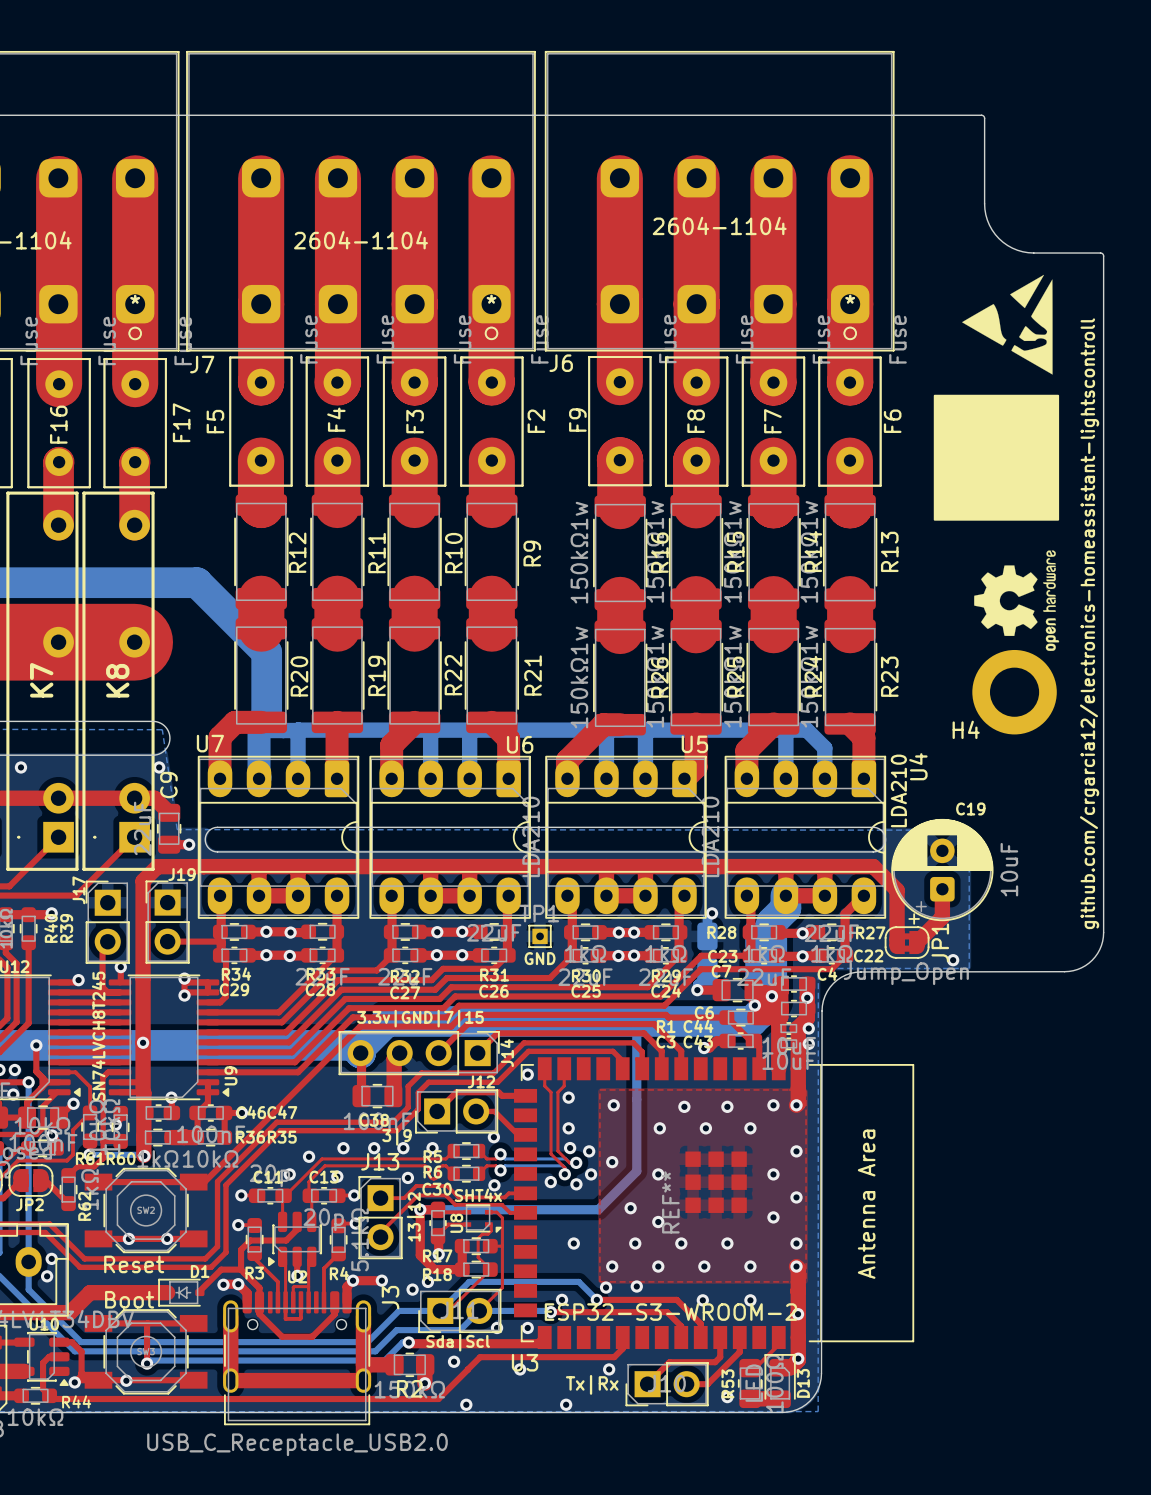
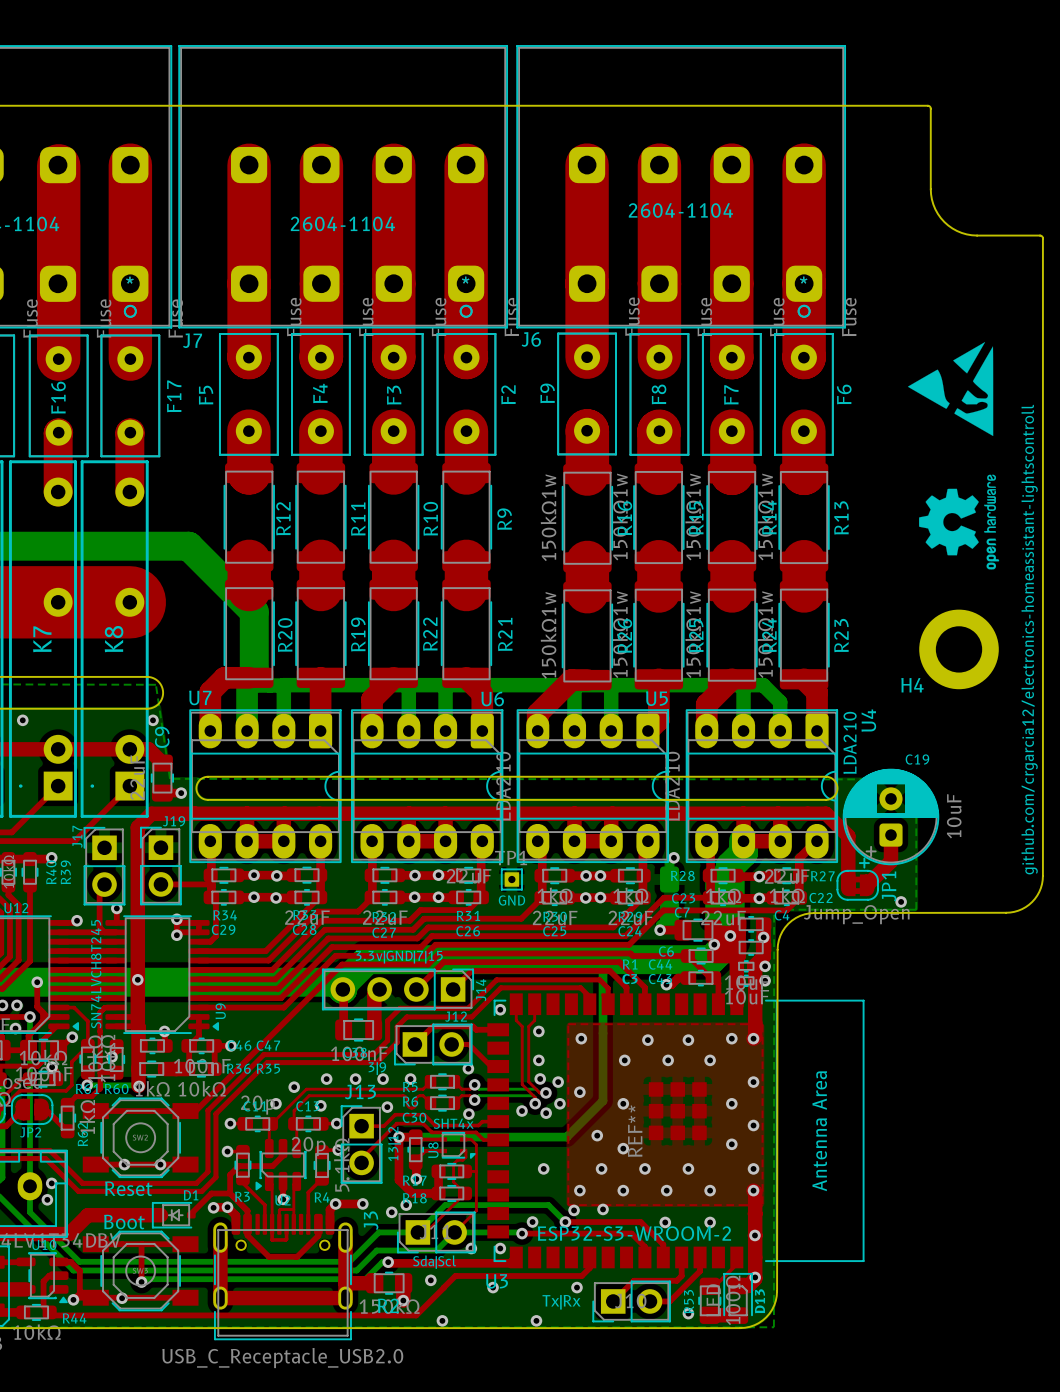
drawing position: (1007, 324) -> (950, 389)
drawing: [933, 394, 1060, 521] -> none
drawing position: (1016, 600) -> (959, 522)

